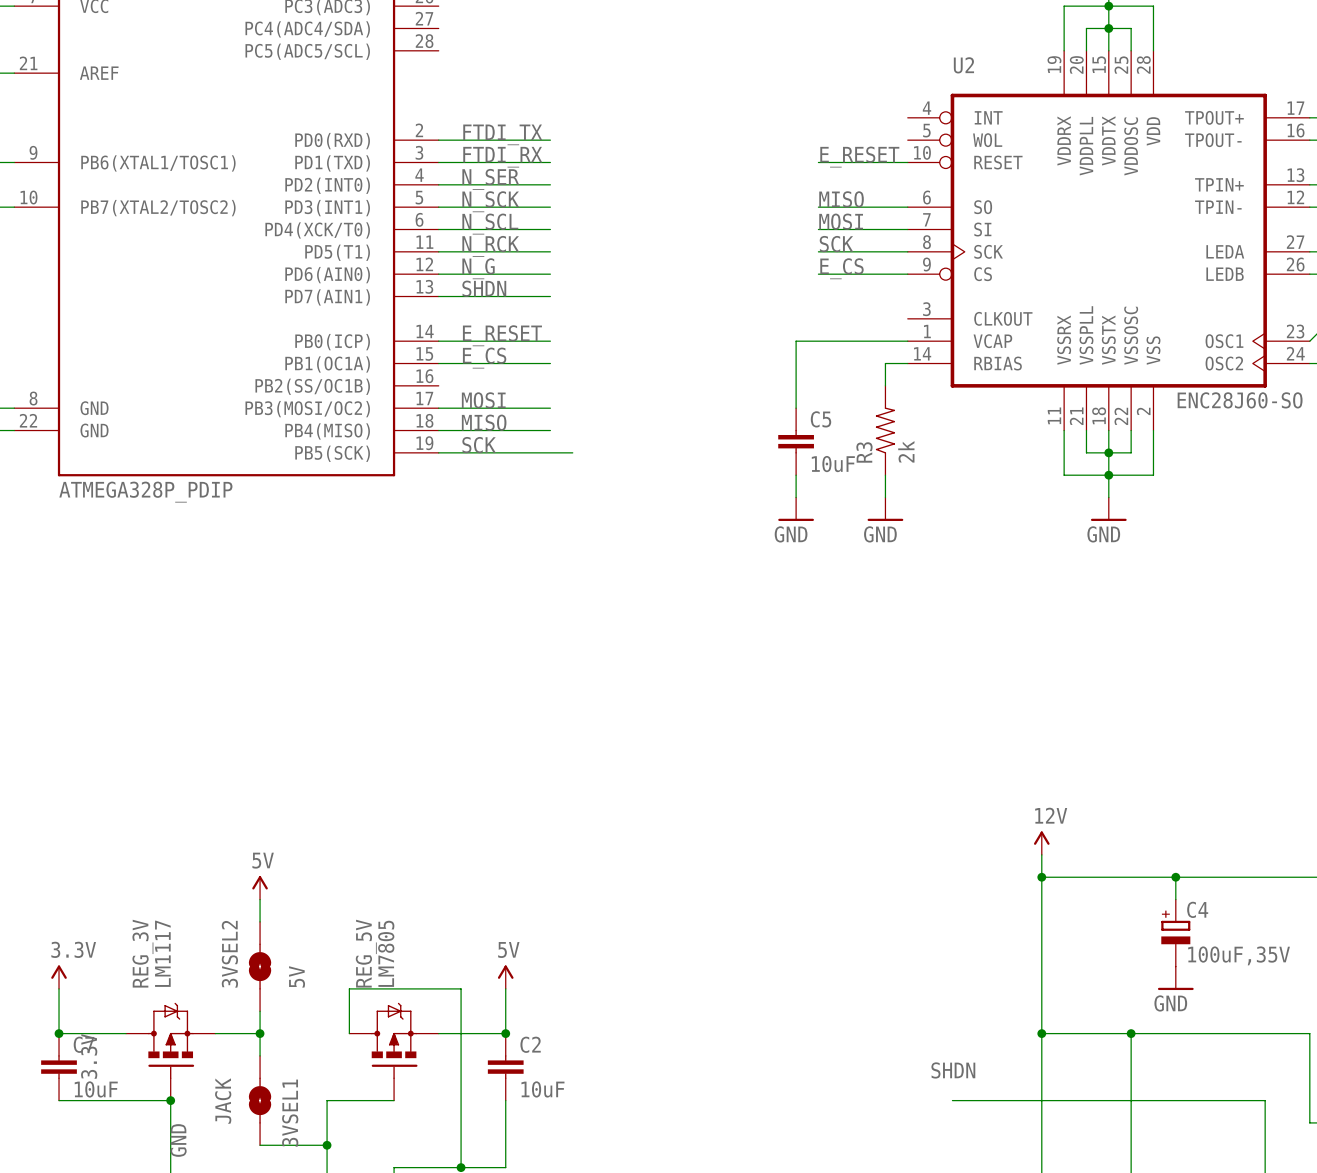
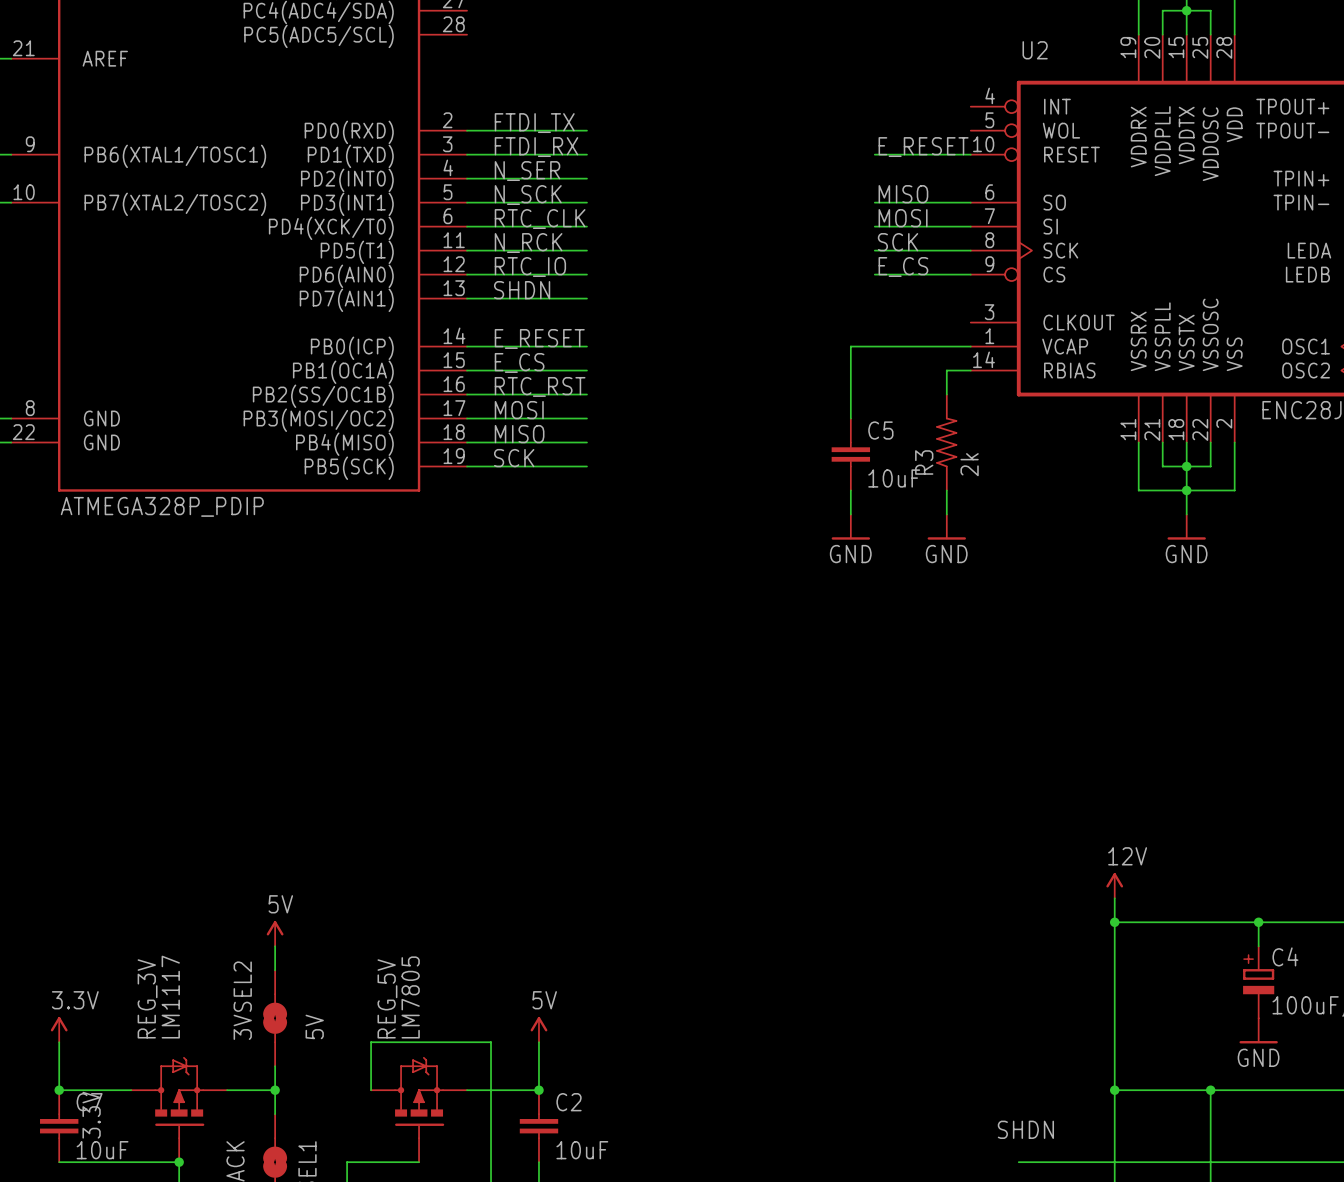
label: N_SCL (490, 224) -> RTC_CLK (540, 219)
label: N_G (478, 268) -> RTC_IO (530, 266)
label: none -> RTC_RST (540, 386)
wire: none -> (467, 394) (586, 394)
wire: (550, 452) (572, 452) -> none

